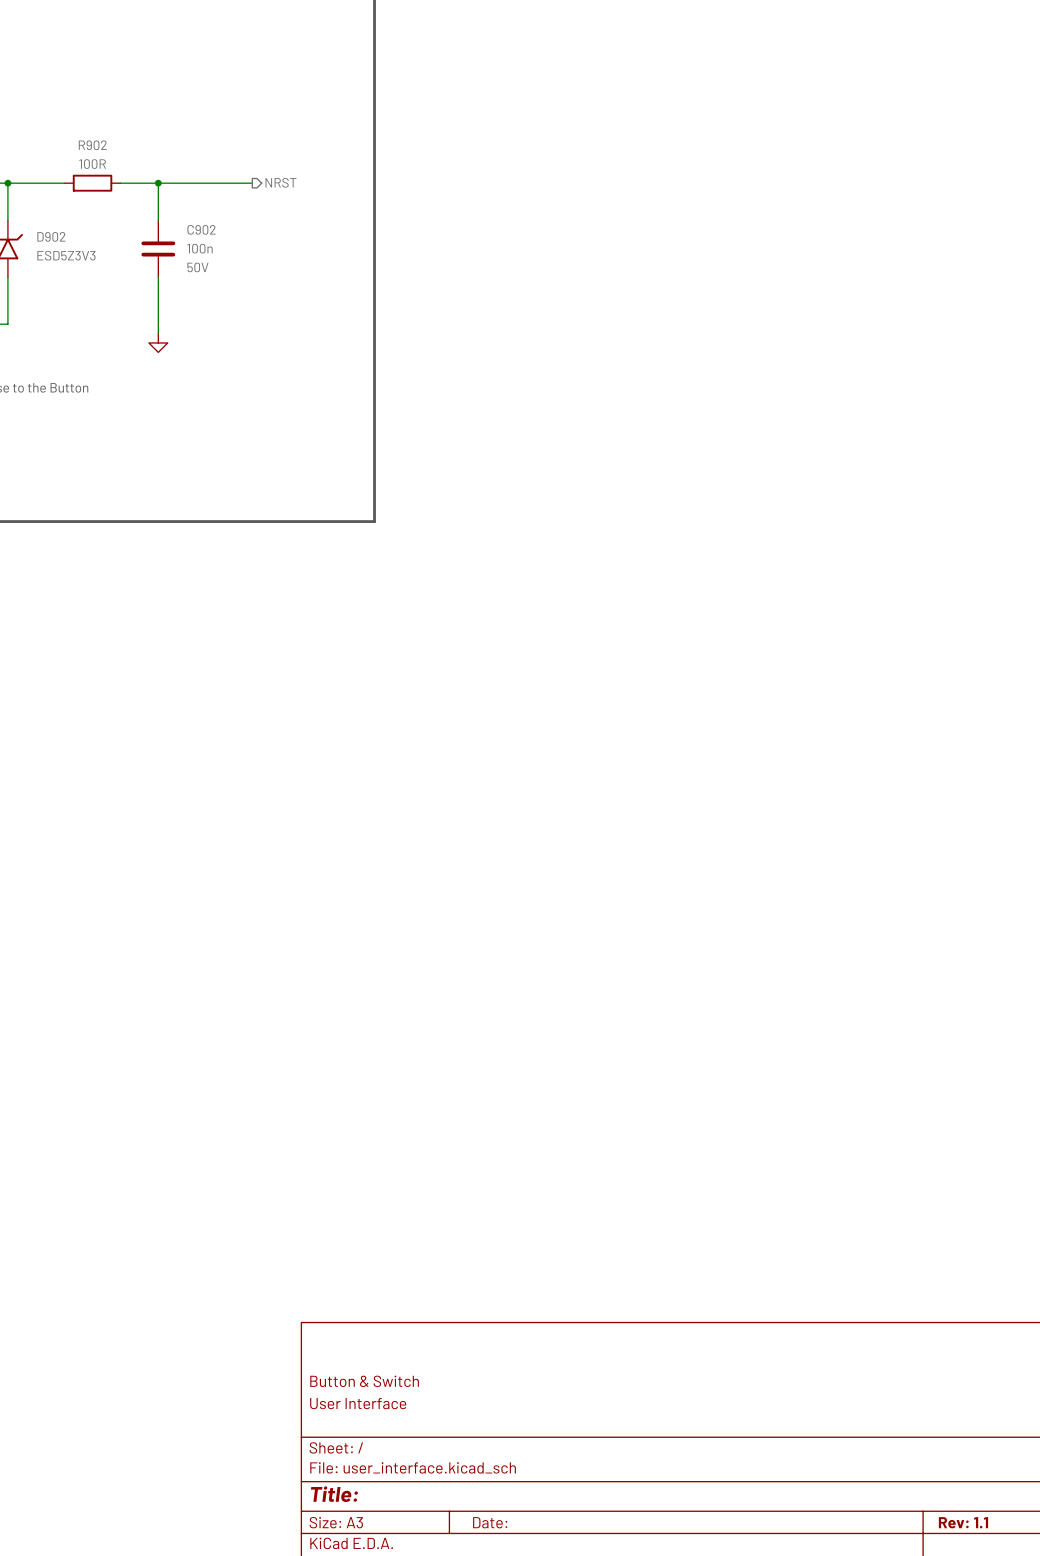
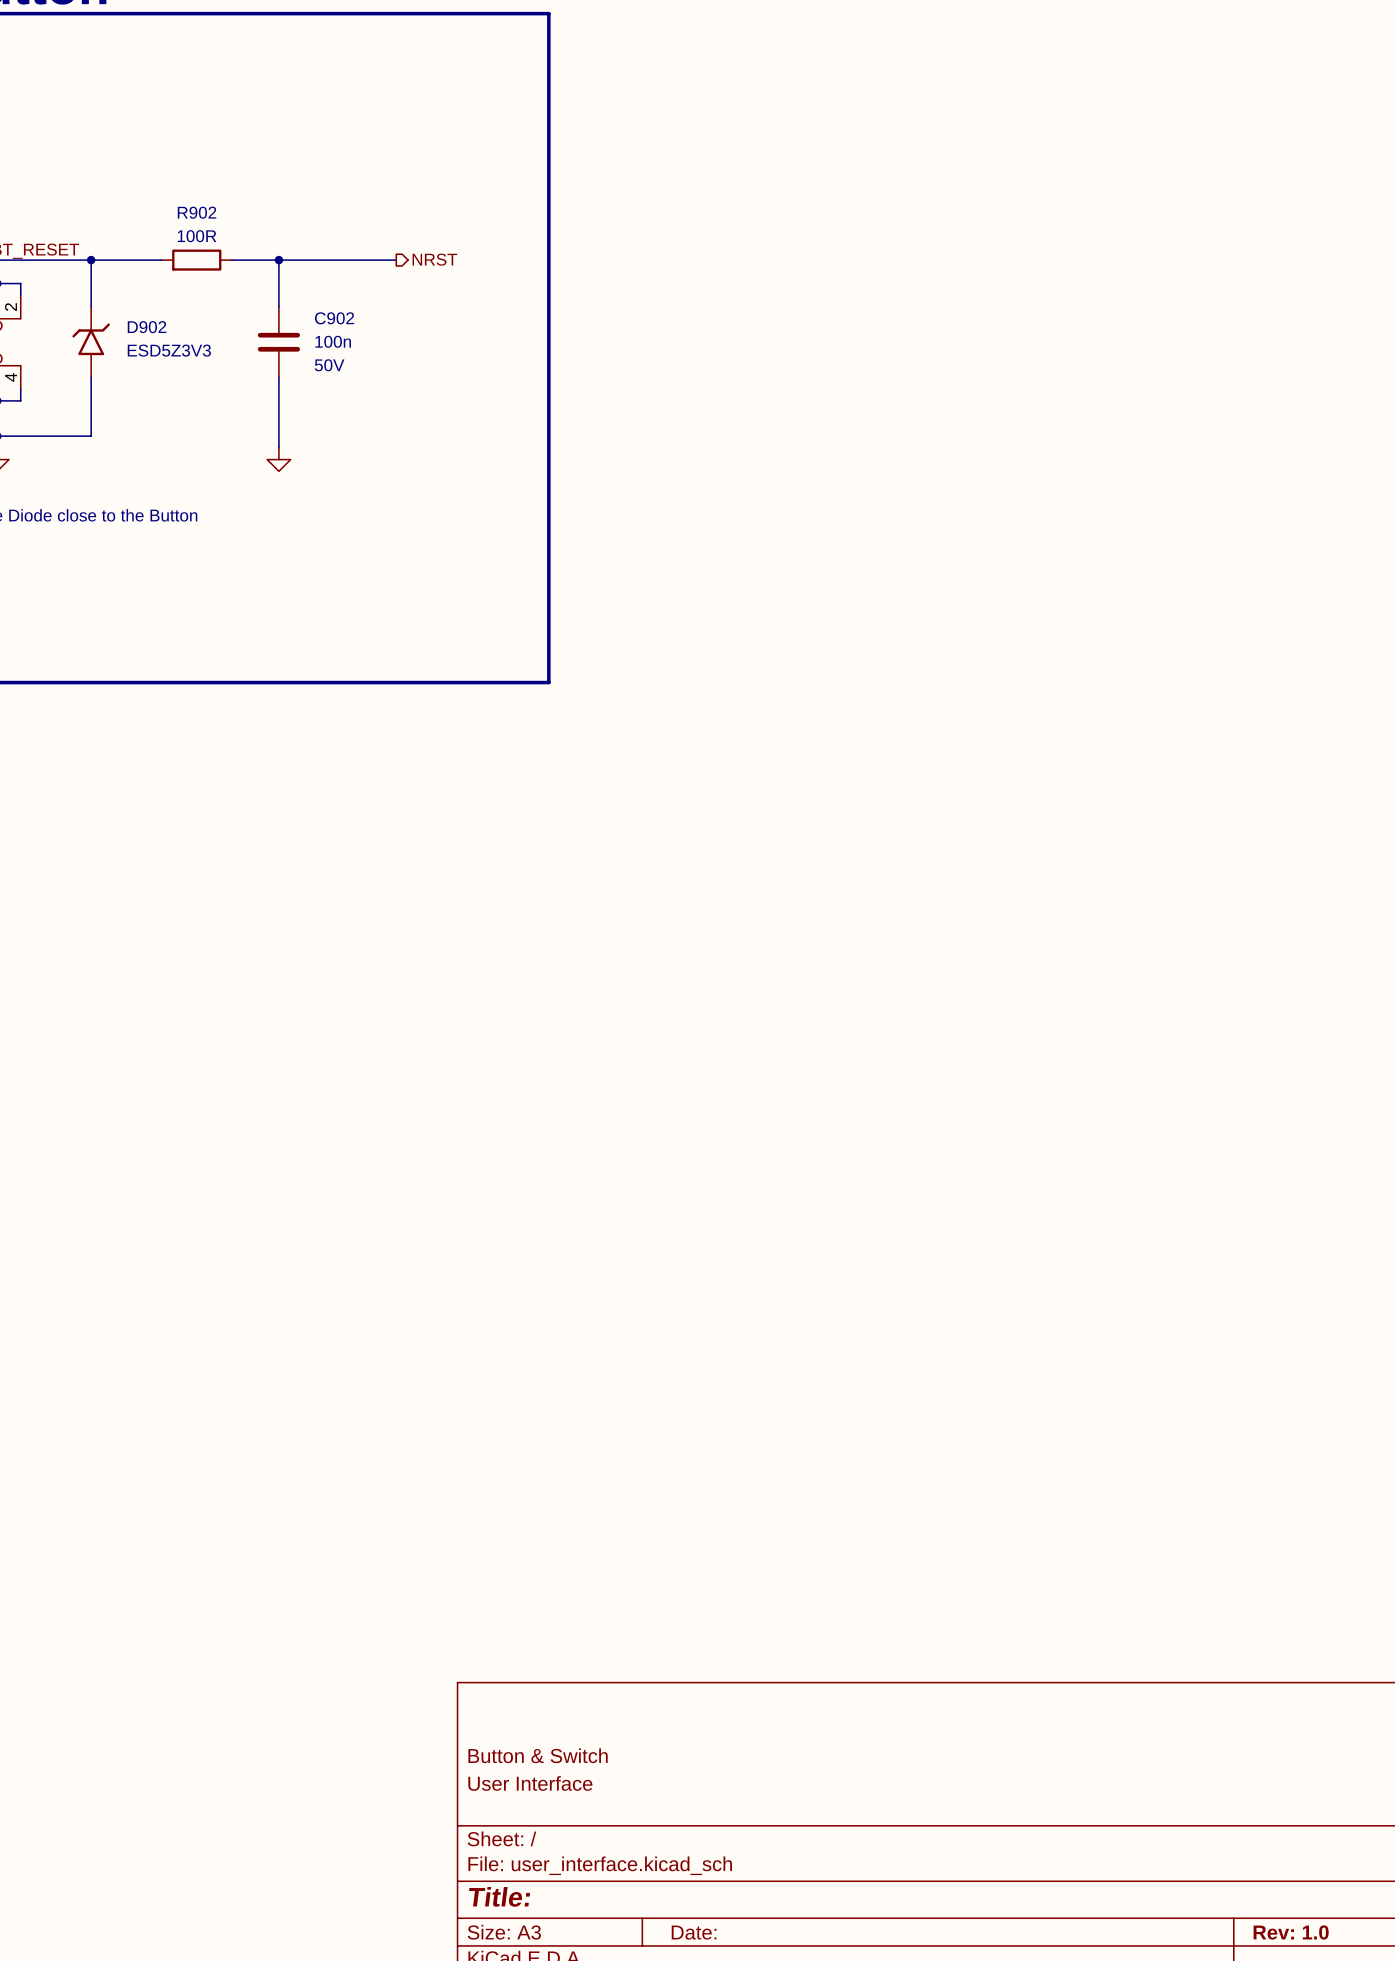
title block: Rev: 1.1 (963, 1522) -> Rev: 1.0 (1291, 1932)

